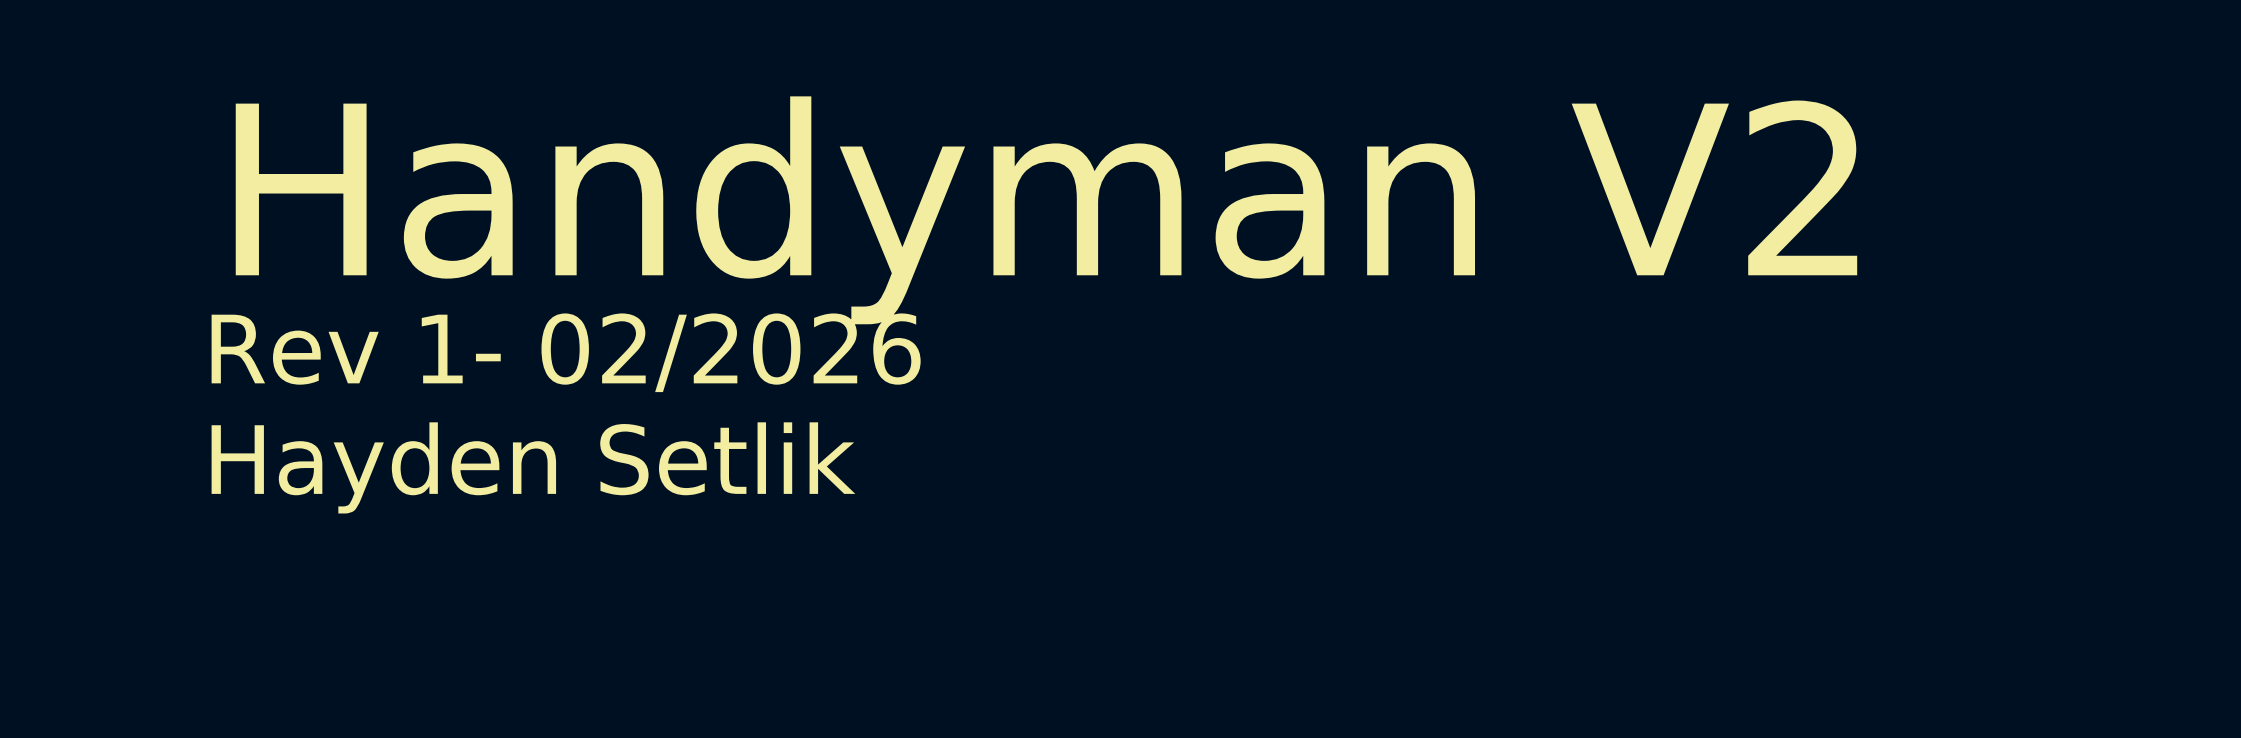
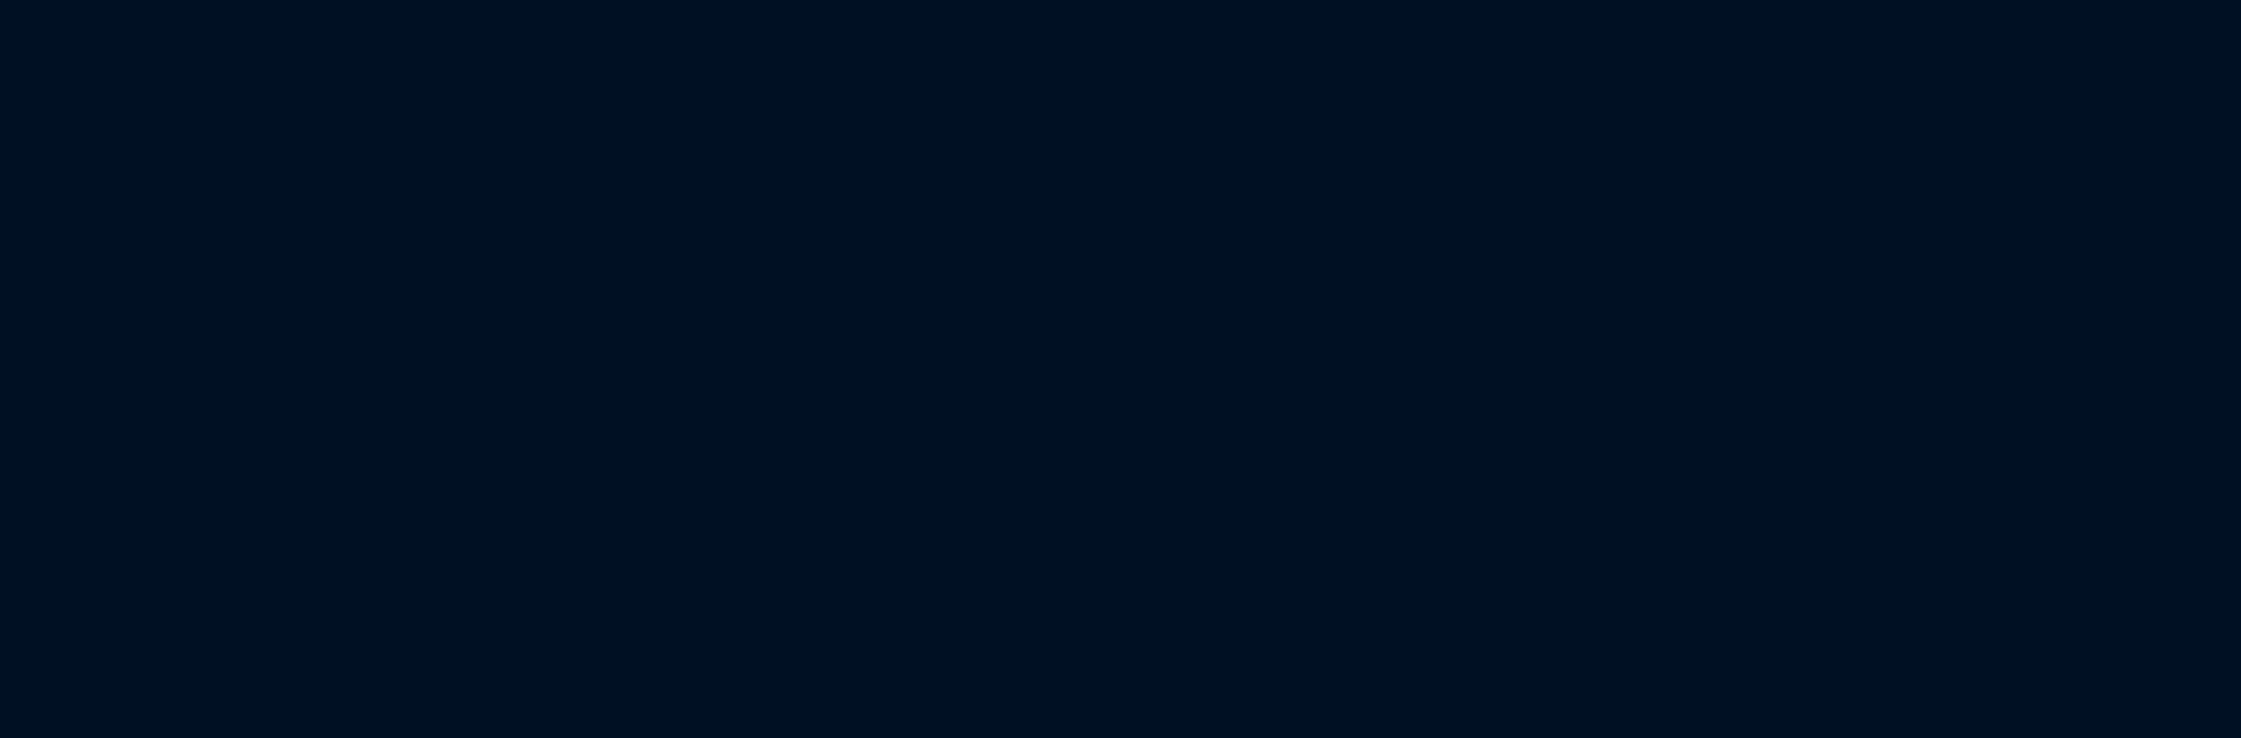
text: Handyman V2 (1046, 210) -> none
text: Rev 1- 02/2026 (566, 352) -> none
text: Hayden Setlik (533, 467) -> none

